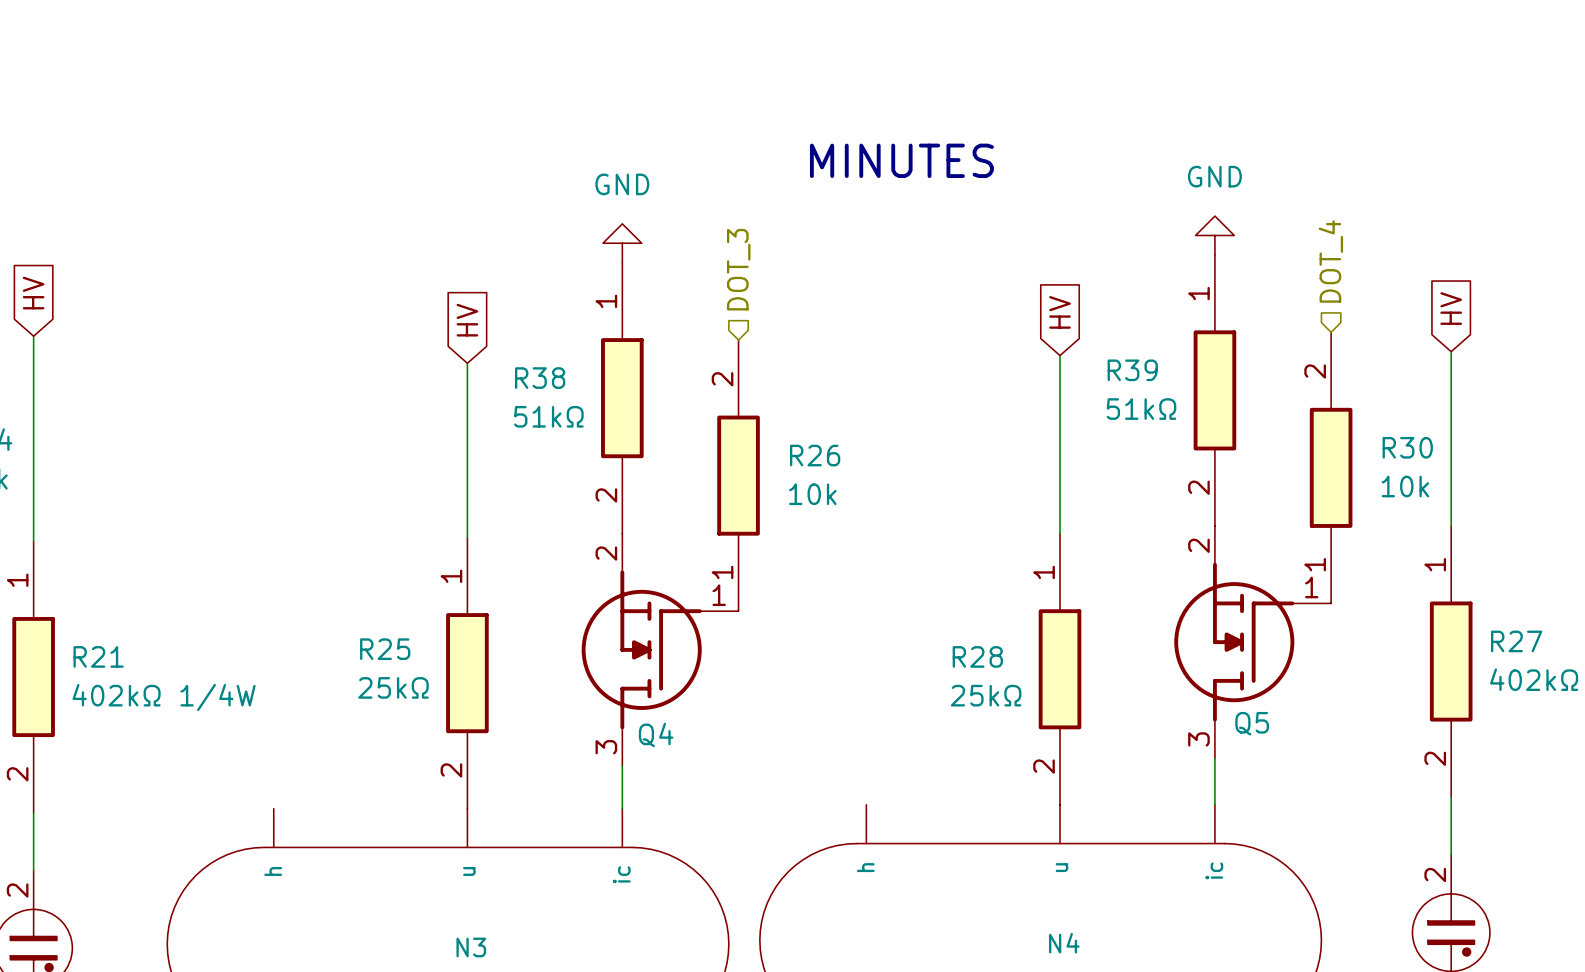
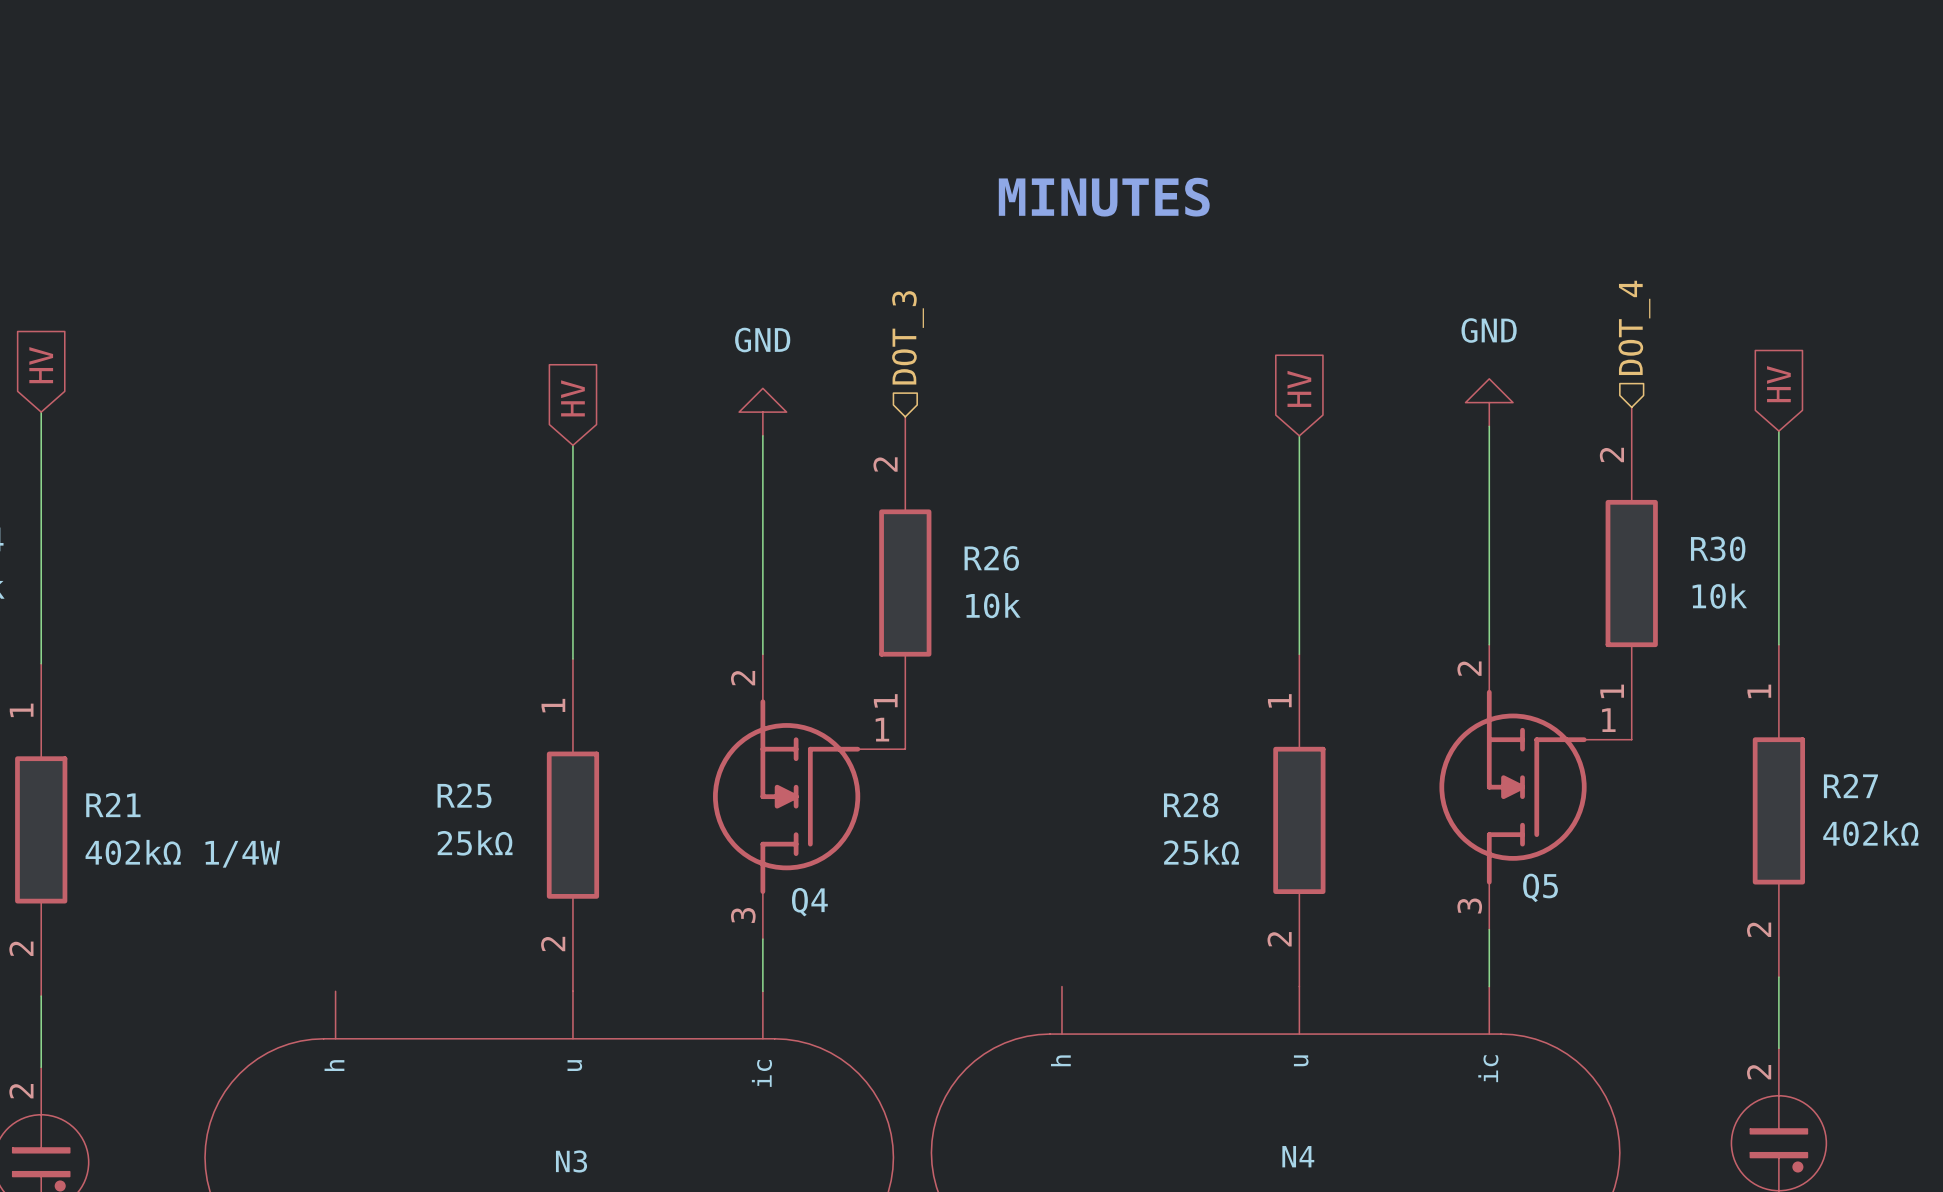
power symbol position: GND (1214, 235) -> GND (1489, 402)
power symbol position: GND (622, 243) -> GND (762, 412)
R39: 51kΩ (1214, 390) -> none
R38: 51kΩ (622, 398) -> none

